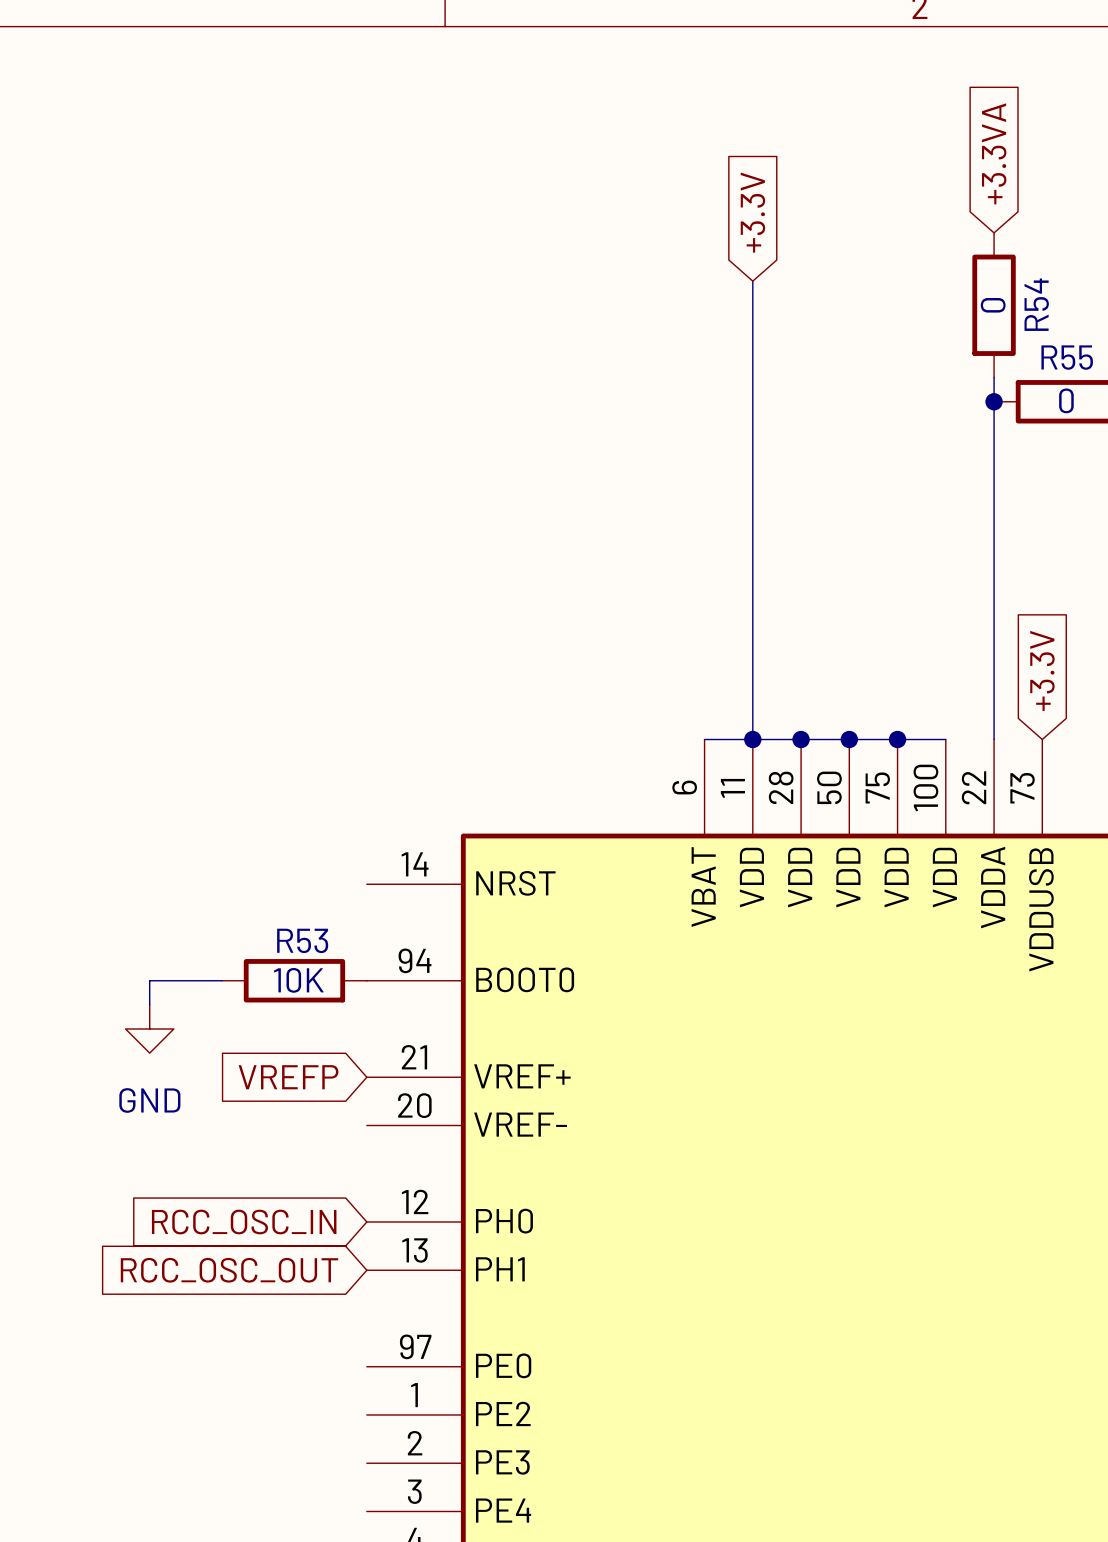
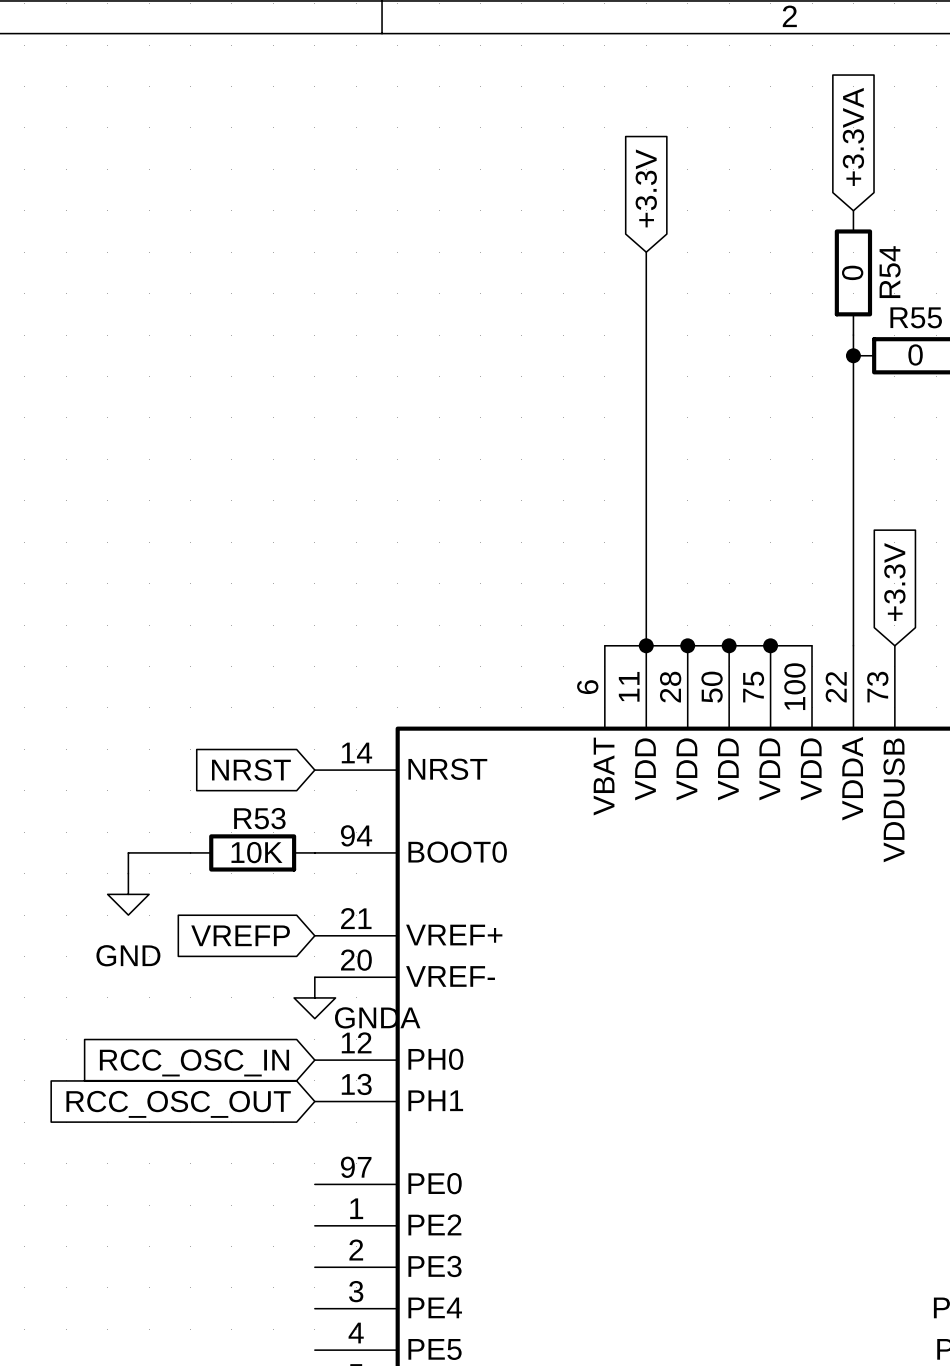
global label: none -> NRST (251, 770)
power symbol: none -> GNDA (314, 997)

